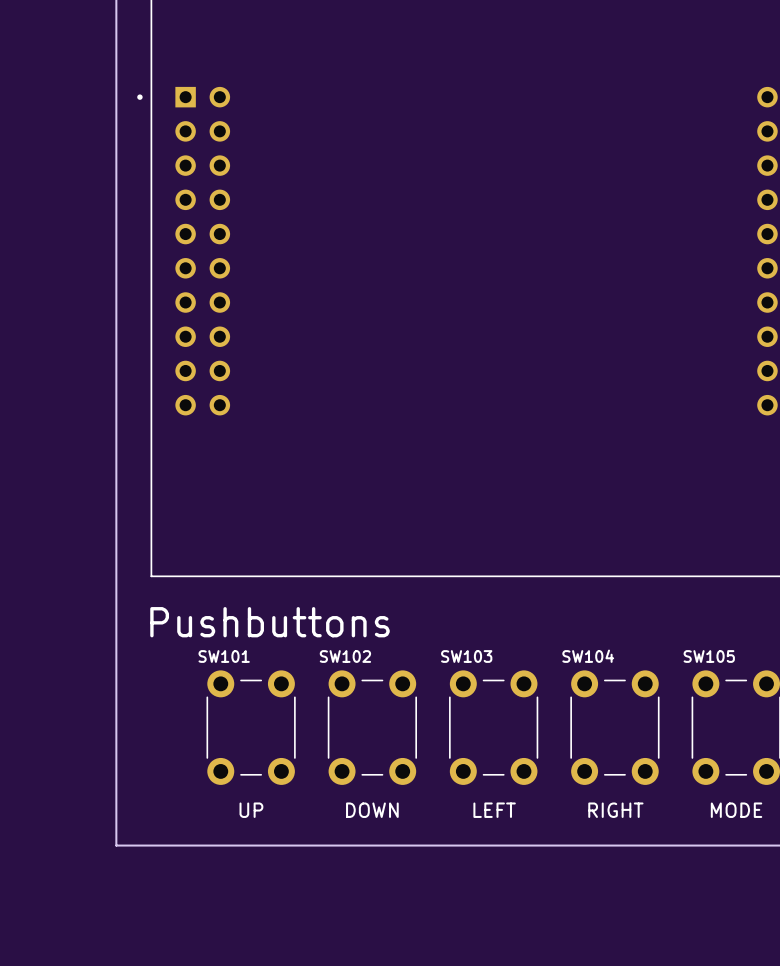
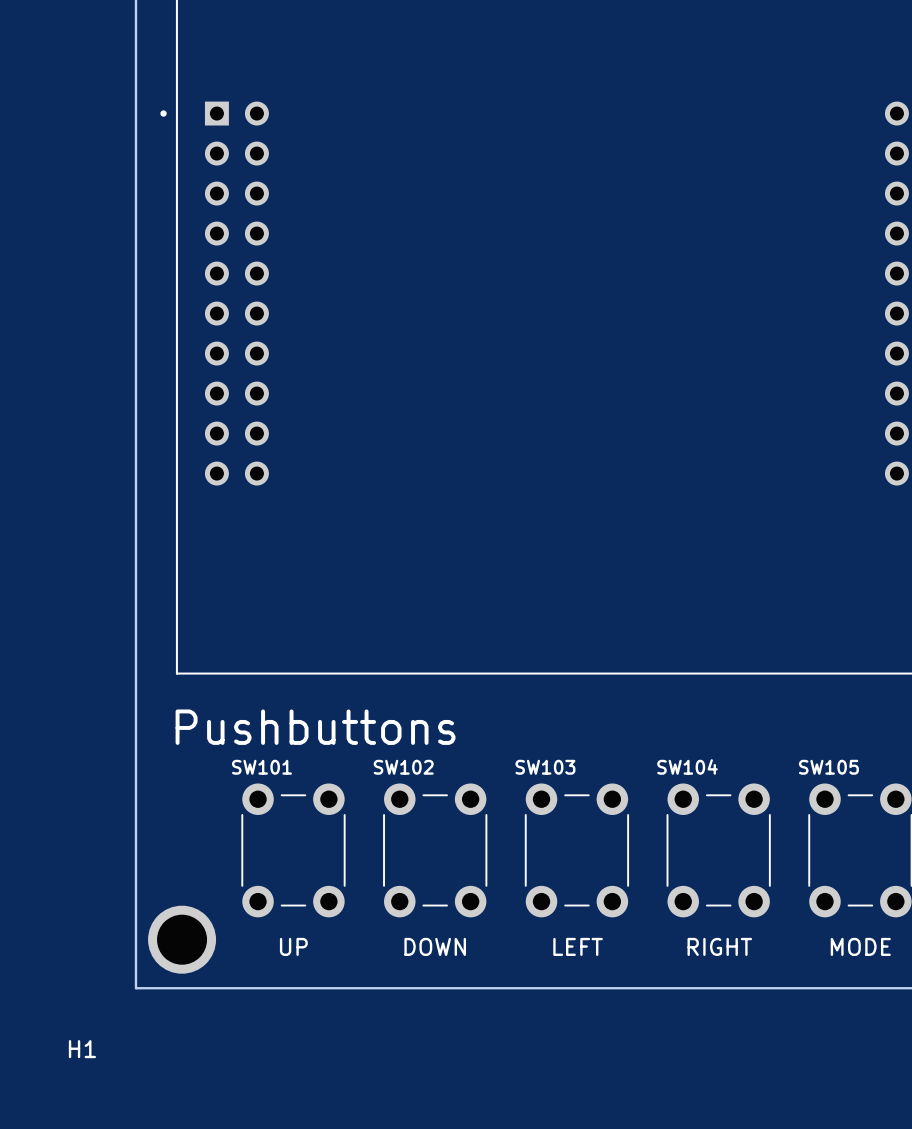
H1: none -> (182, 939)

